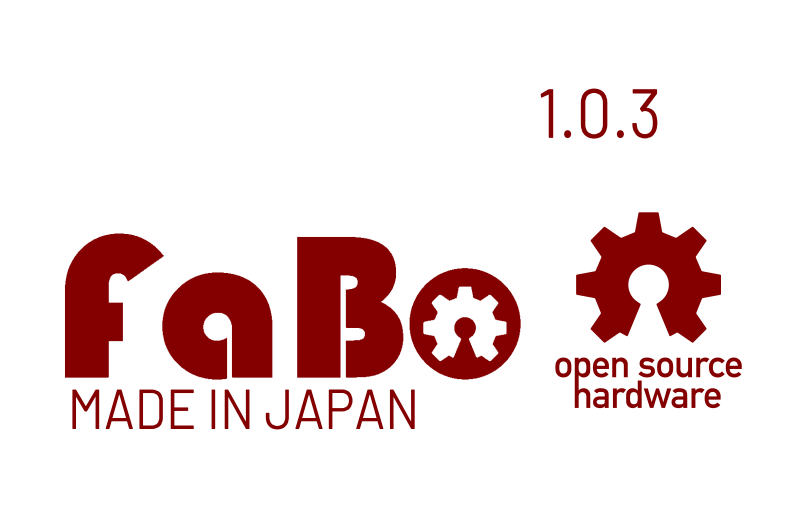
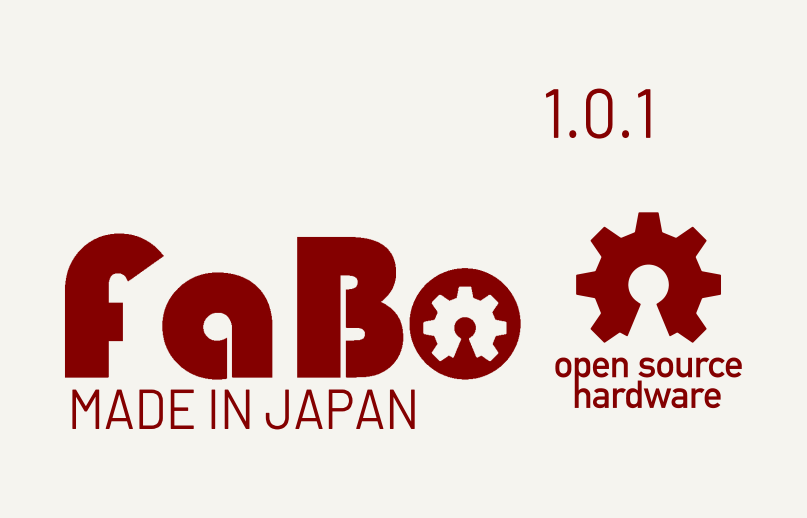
text: 1.0.3 (599, 113) -> 1.0.1 (598, 113)

